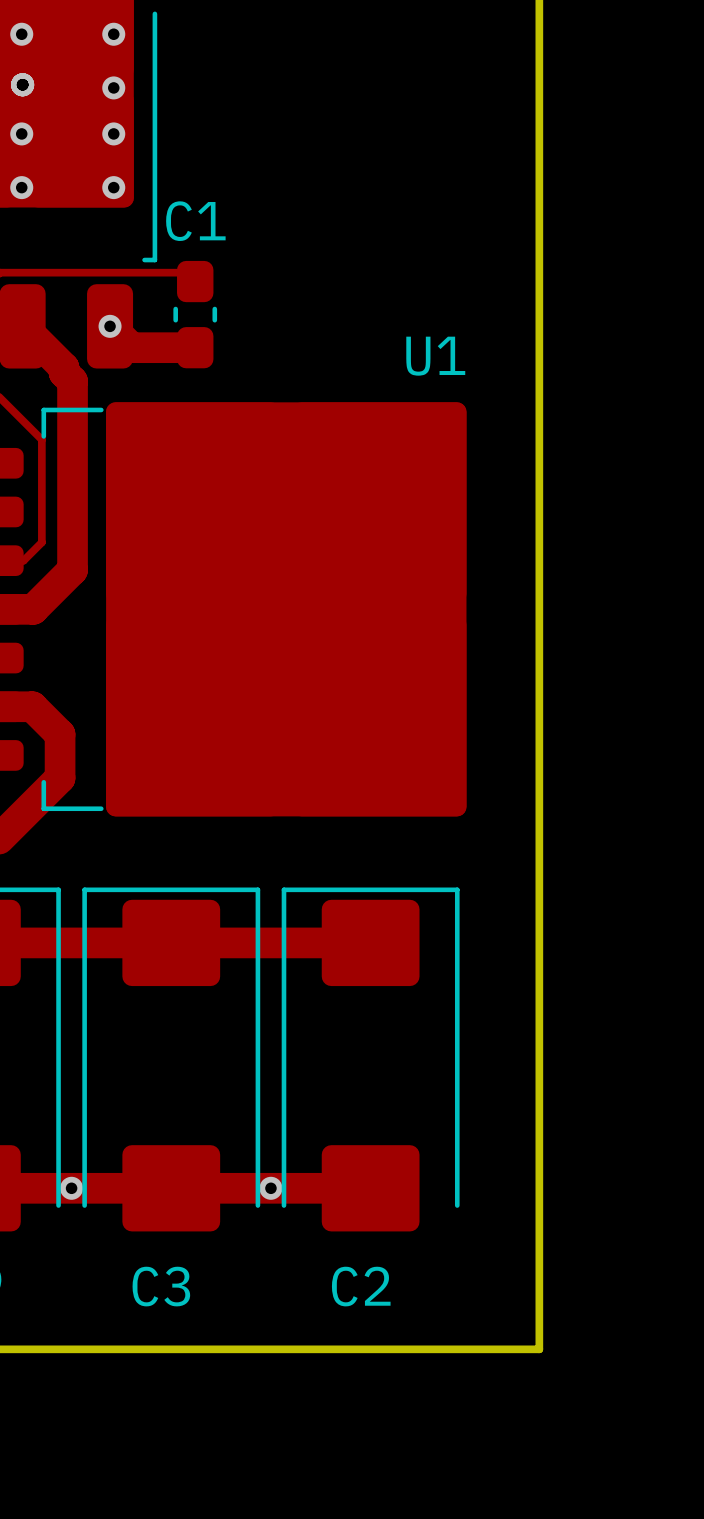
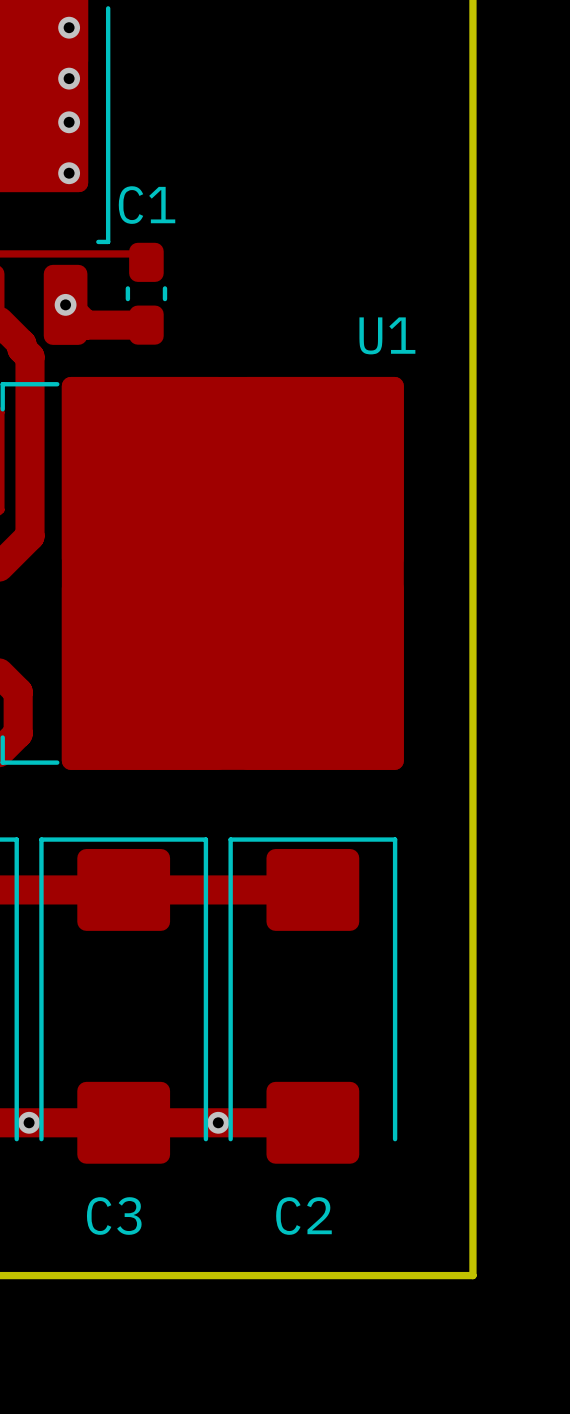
U1 name position: U1 (435, 356) -> U1 (387, 335)

